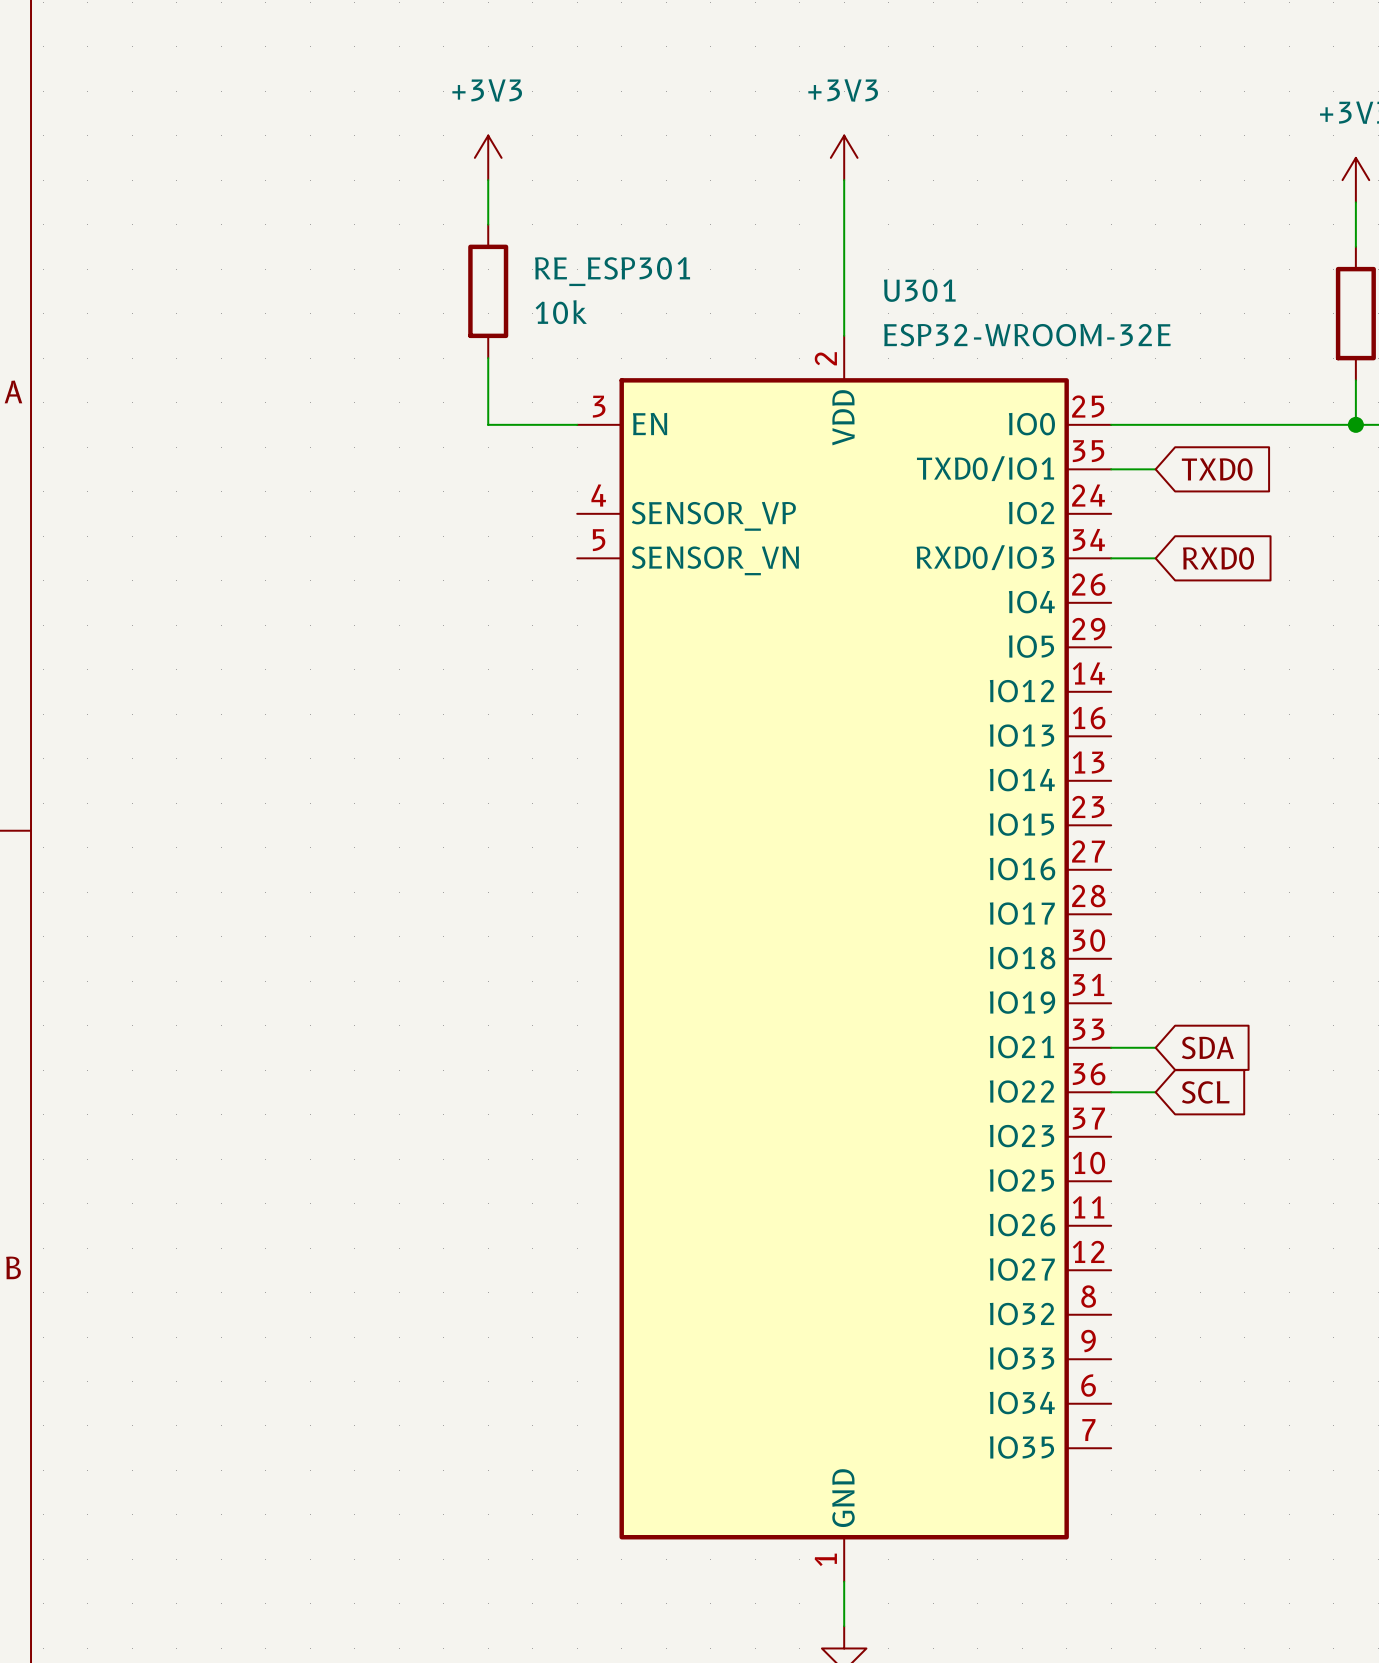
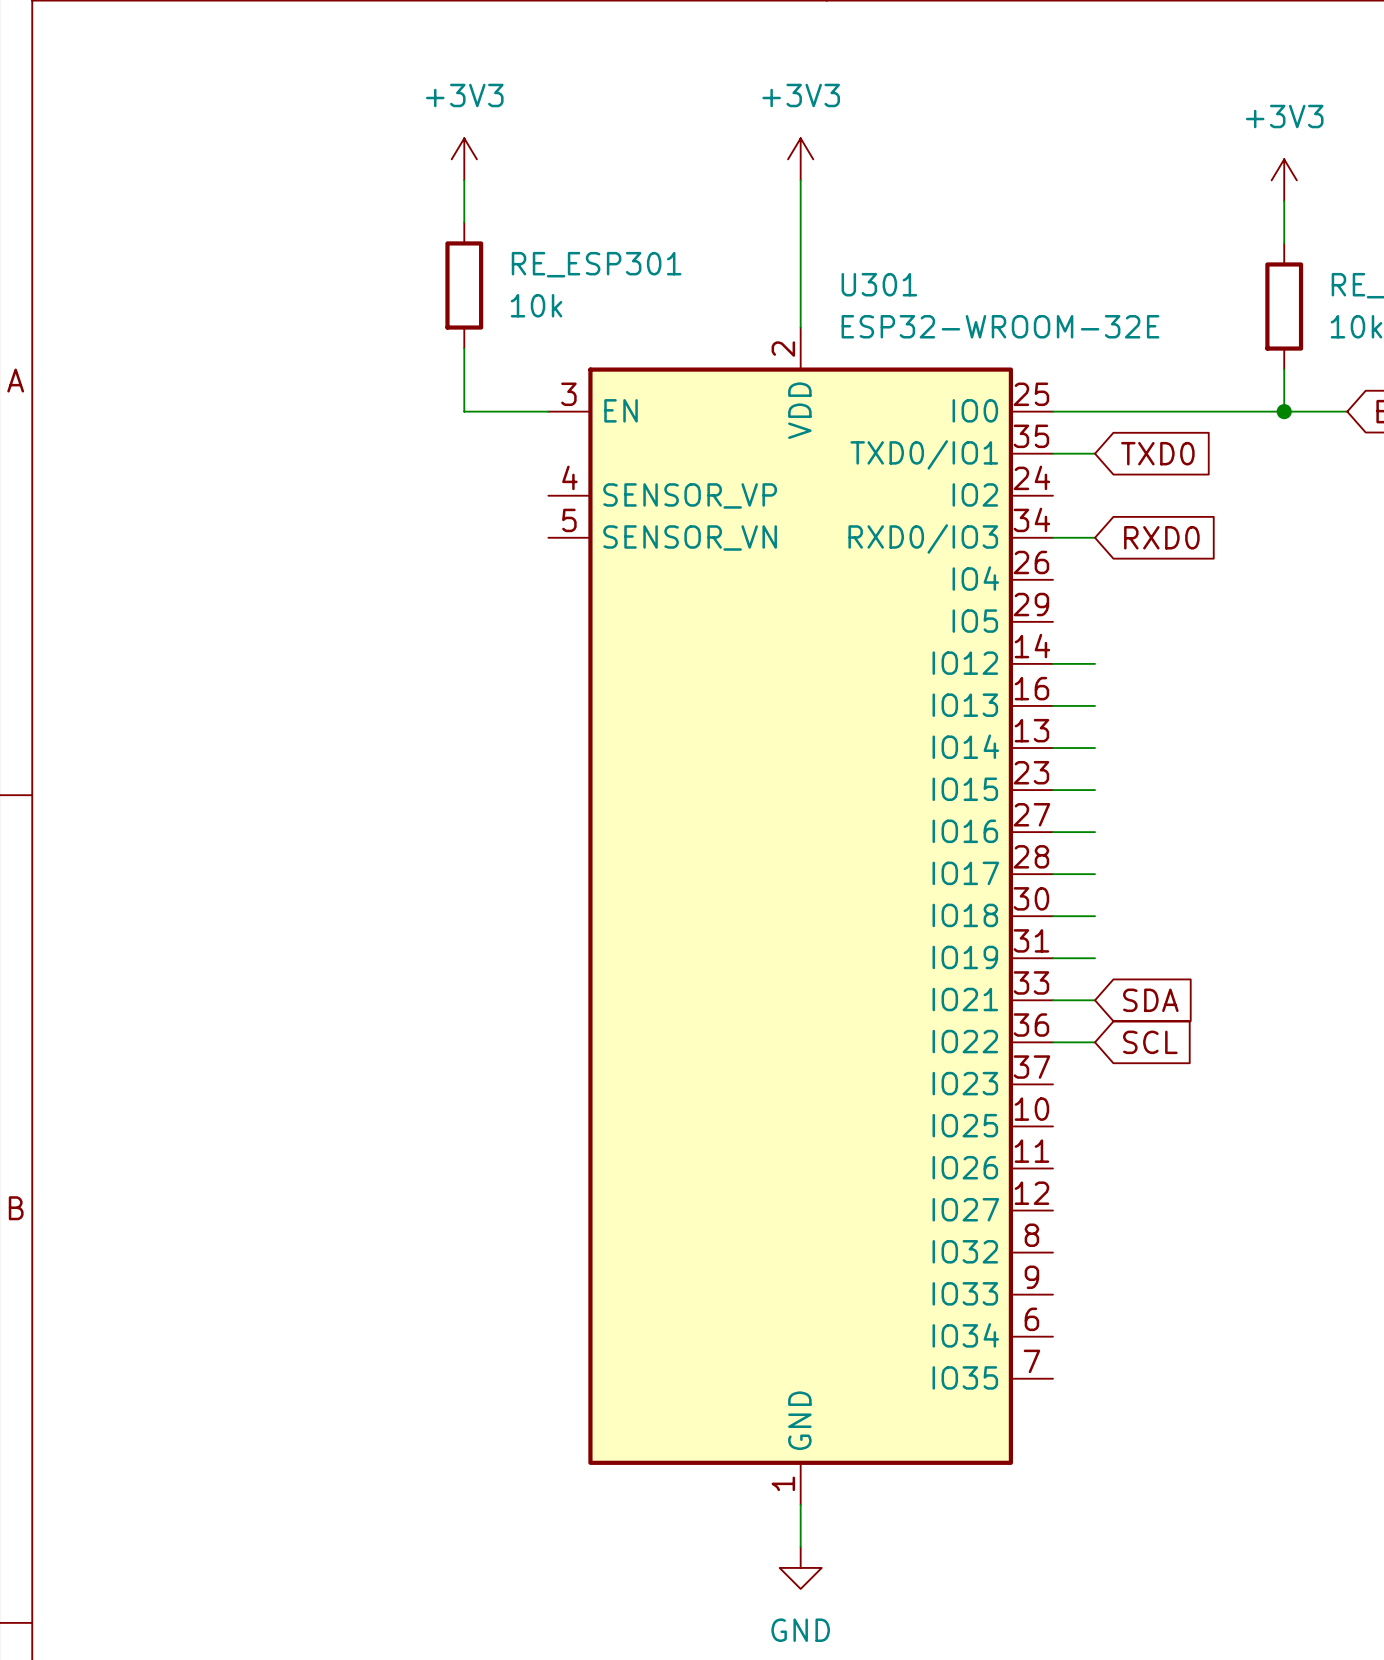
wire: none -> (1052, 663) (1095, 663)
wire: none -> (1052, 705) (1095, 705)
wire: none -> (1052, 748) (1095, 748)
wire: none -> (1052, 790) (1095, 790)
wire: none -> (1052, 832) (1095, 832)
wire: none -> (1052, 874) (1095, 874)
wire: none -> (1052, 916) (1095, 916)
wire: none -> (1052, 958) (1095, 958)

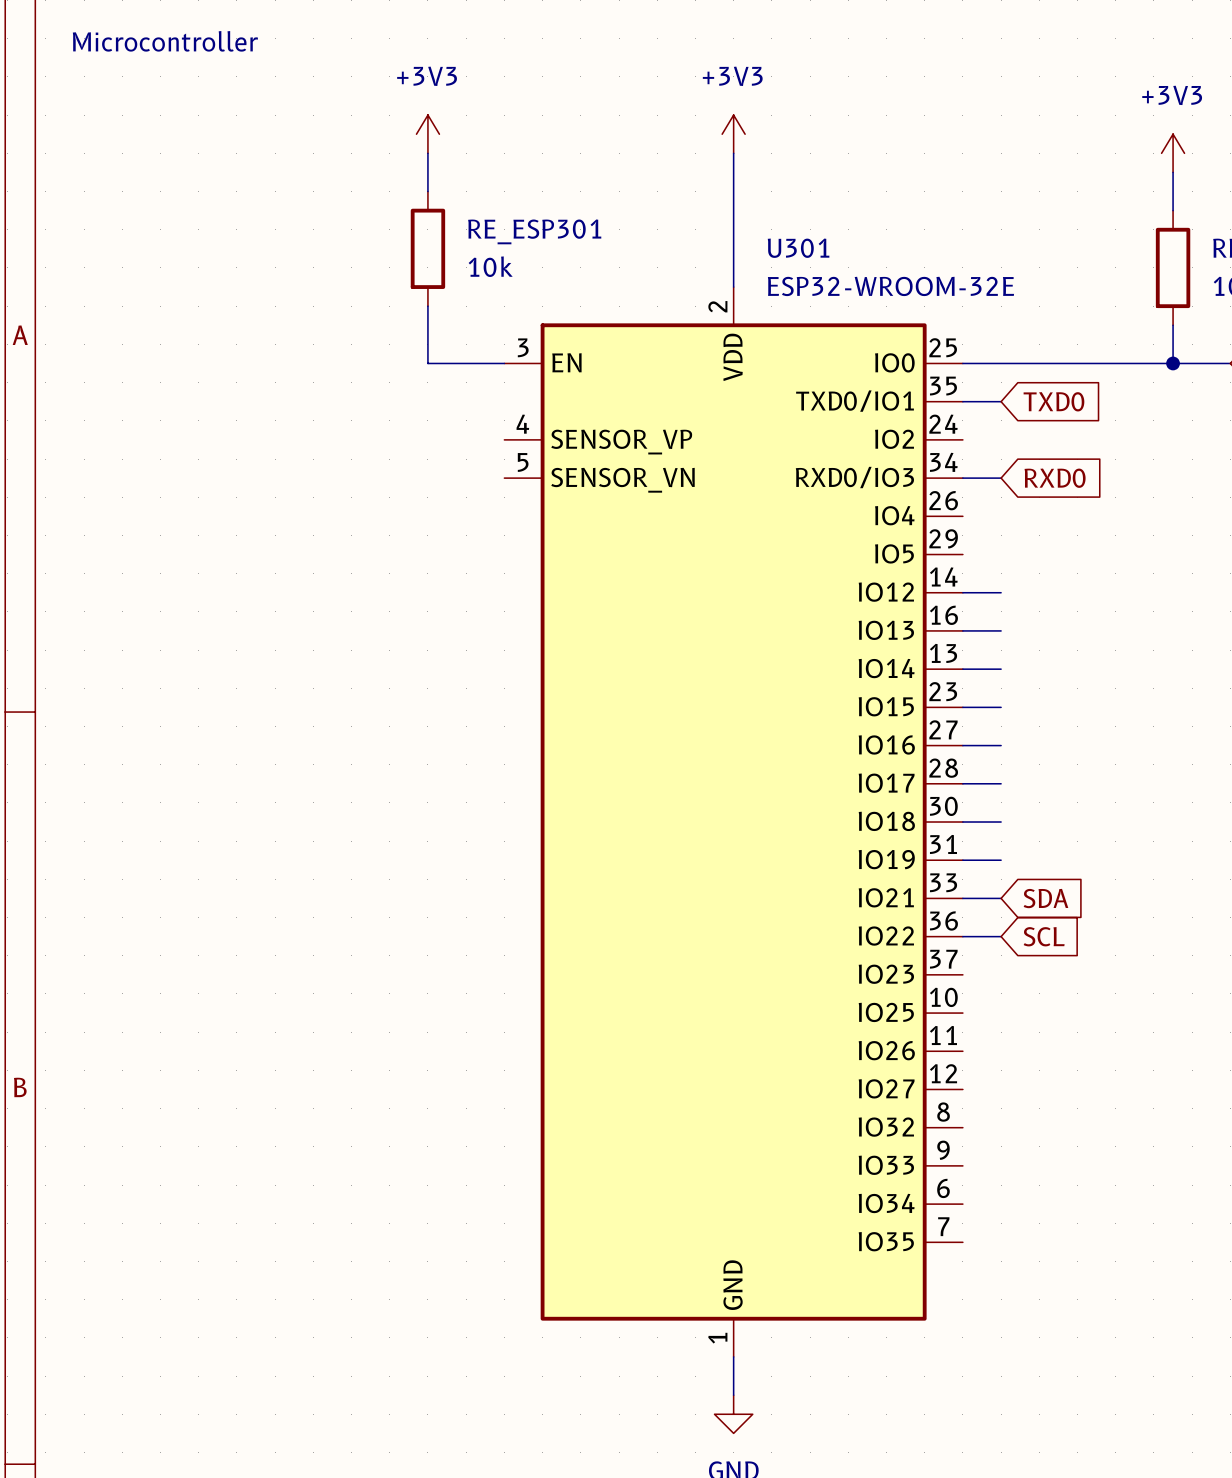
text: none -> Microcontroller (165, 41)

